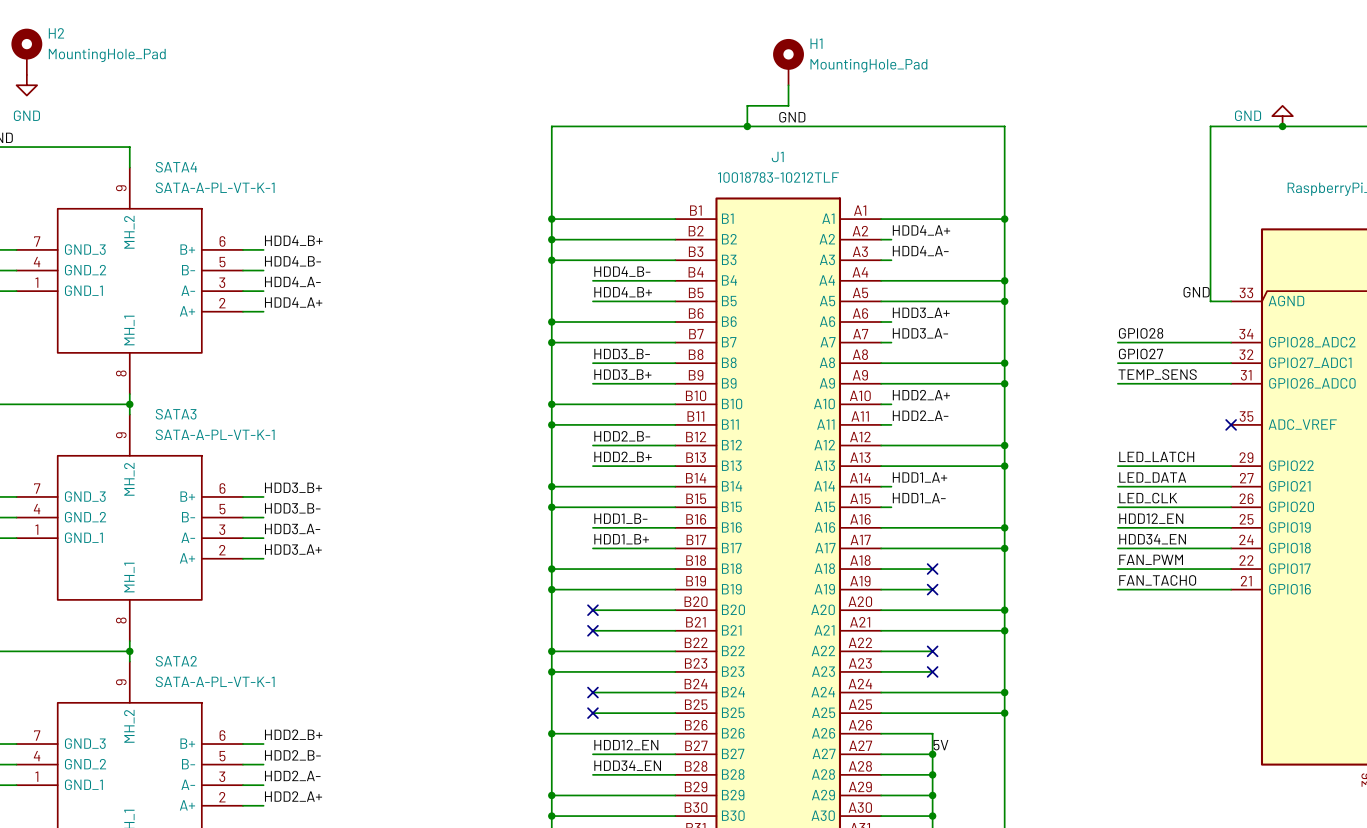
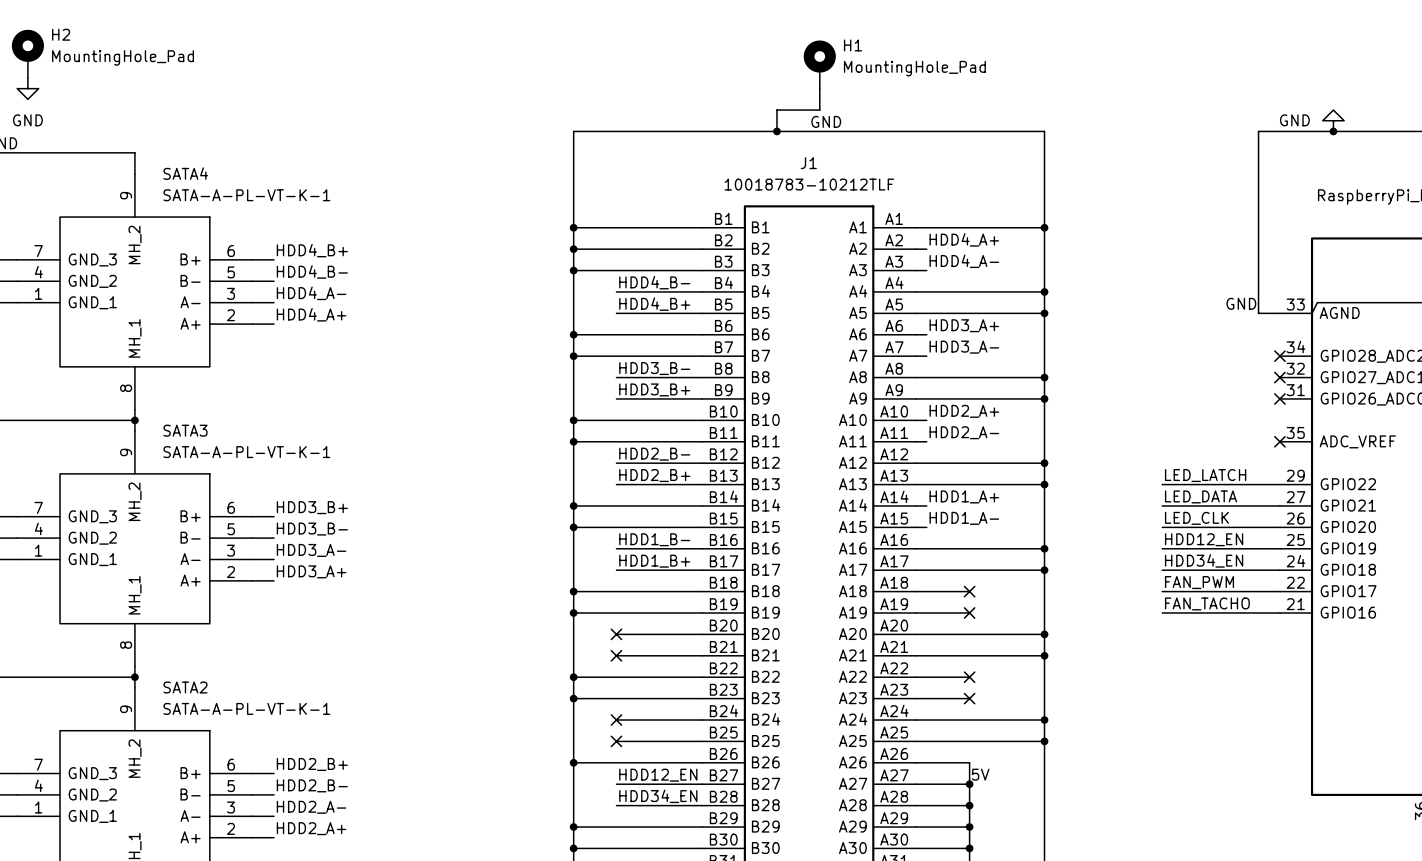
label: GPIO28 (1141, 333) -> none
wire: (1117, 342) (1231, 342) -> none
no-connect mark: none -> (1279, 356)
label: GPIO27 (1141, 353) -> none
wire: (1117, 363) (1231, 363) -> none
no-connect mark: none -> (1279, 377)
label: TEMP_SENS (1157, 374) -> none
wire: (1117, 383) (1231, 383) -> none
no-connect mark: none -> (1279, 398)

